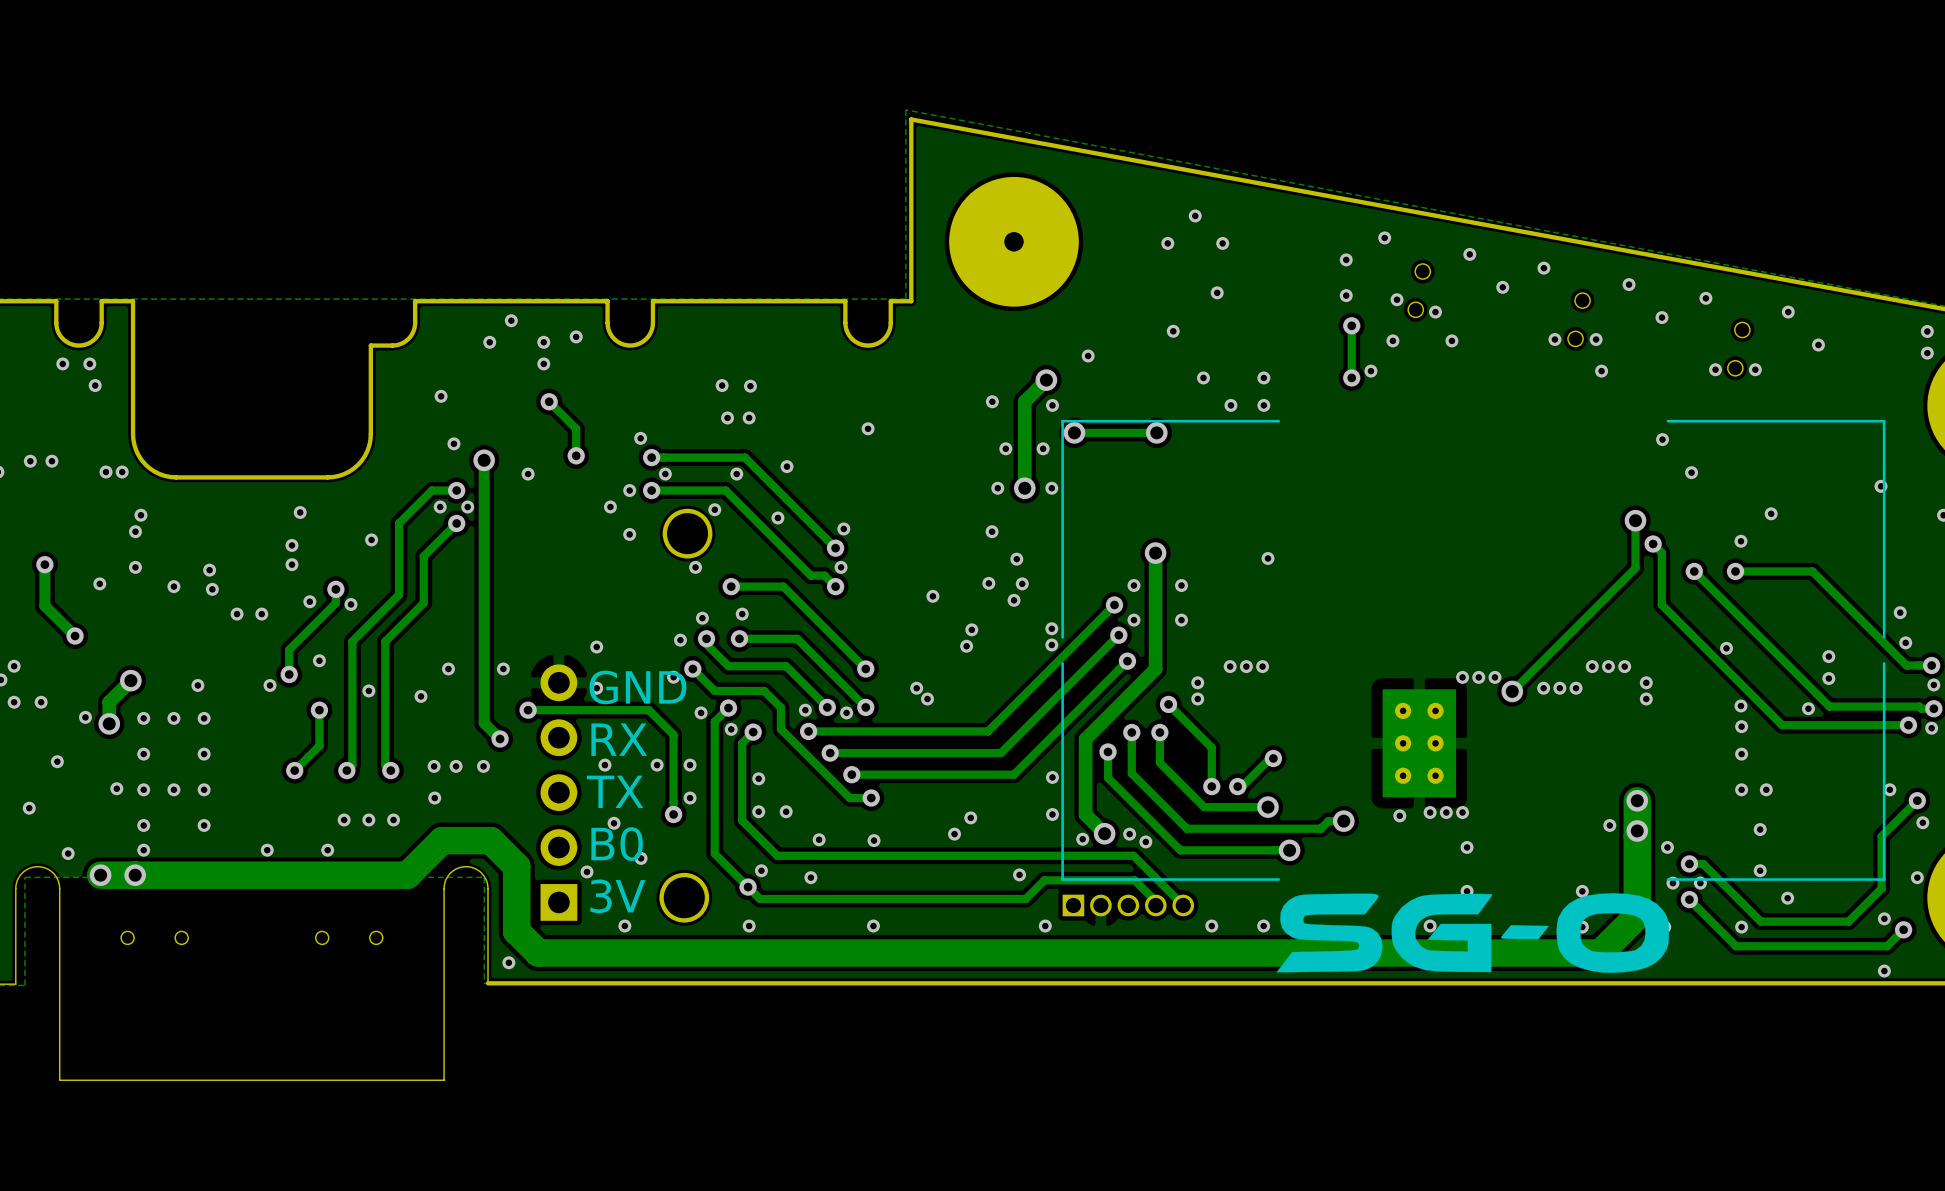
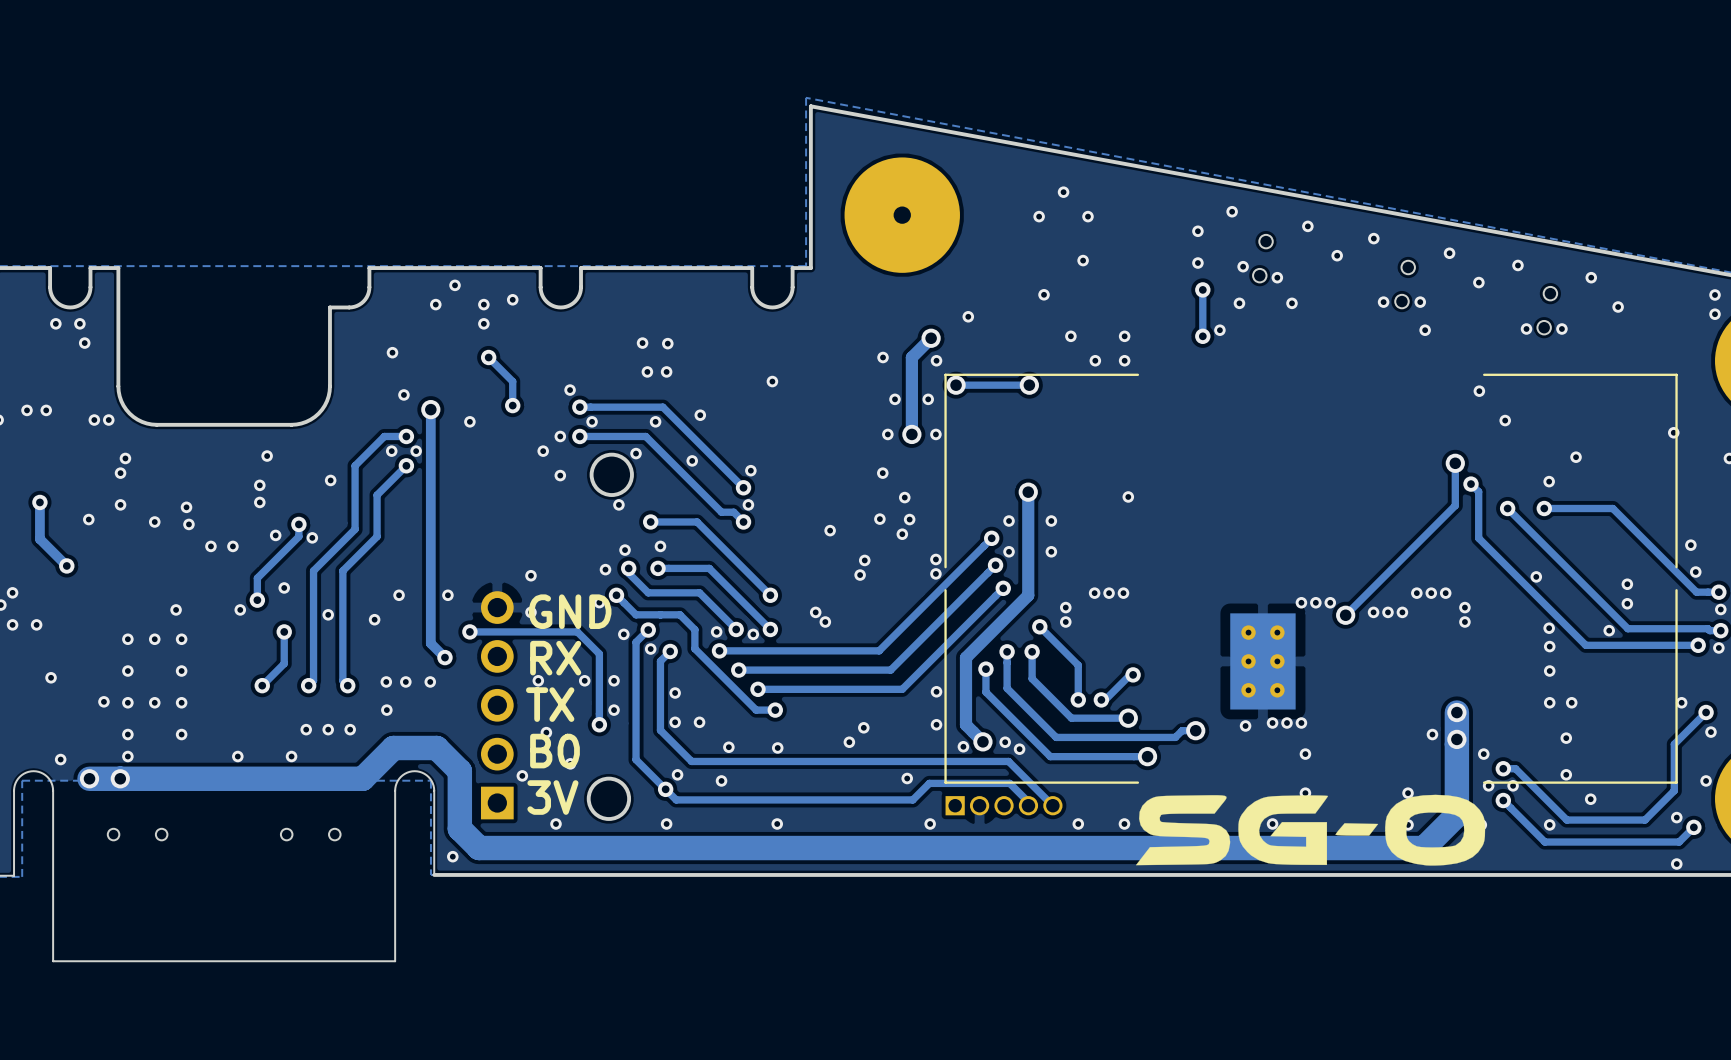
track: (130, 680) (109, 702) (109, 723) -> none
via: (130, 680) -> none
via: (85, 717) -> none
via: (109, 723) -> none
via: (29, 808) -> none

